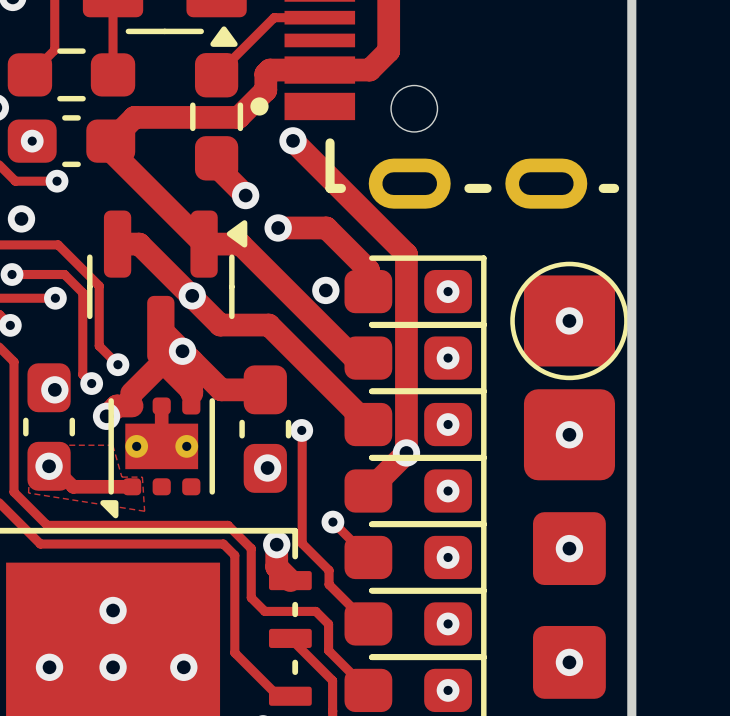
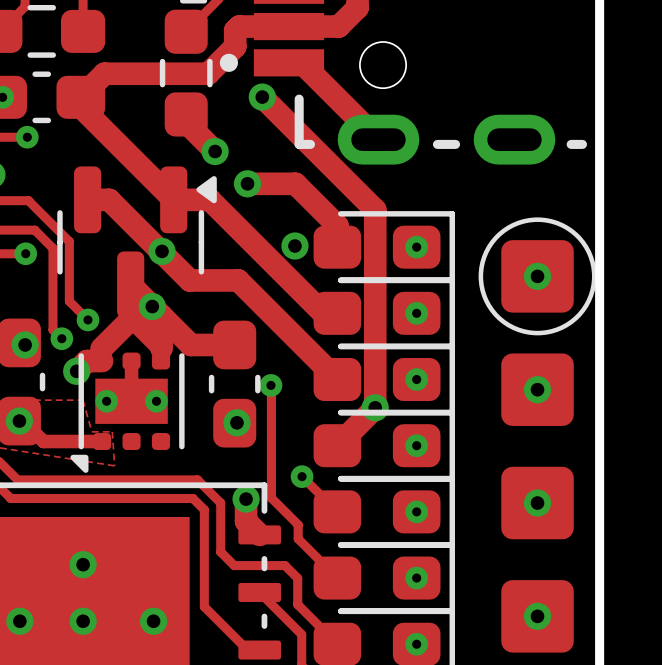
track: none -> (288, 62) (301, 62) (378, 139)
part footprint: [510, 261, 629, 699] -> [478, 217, 597, 653]

